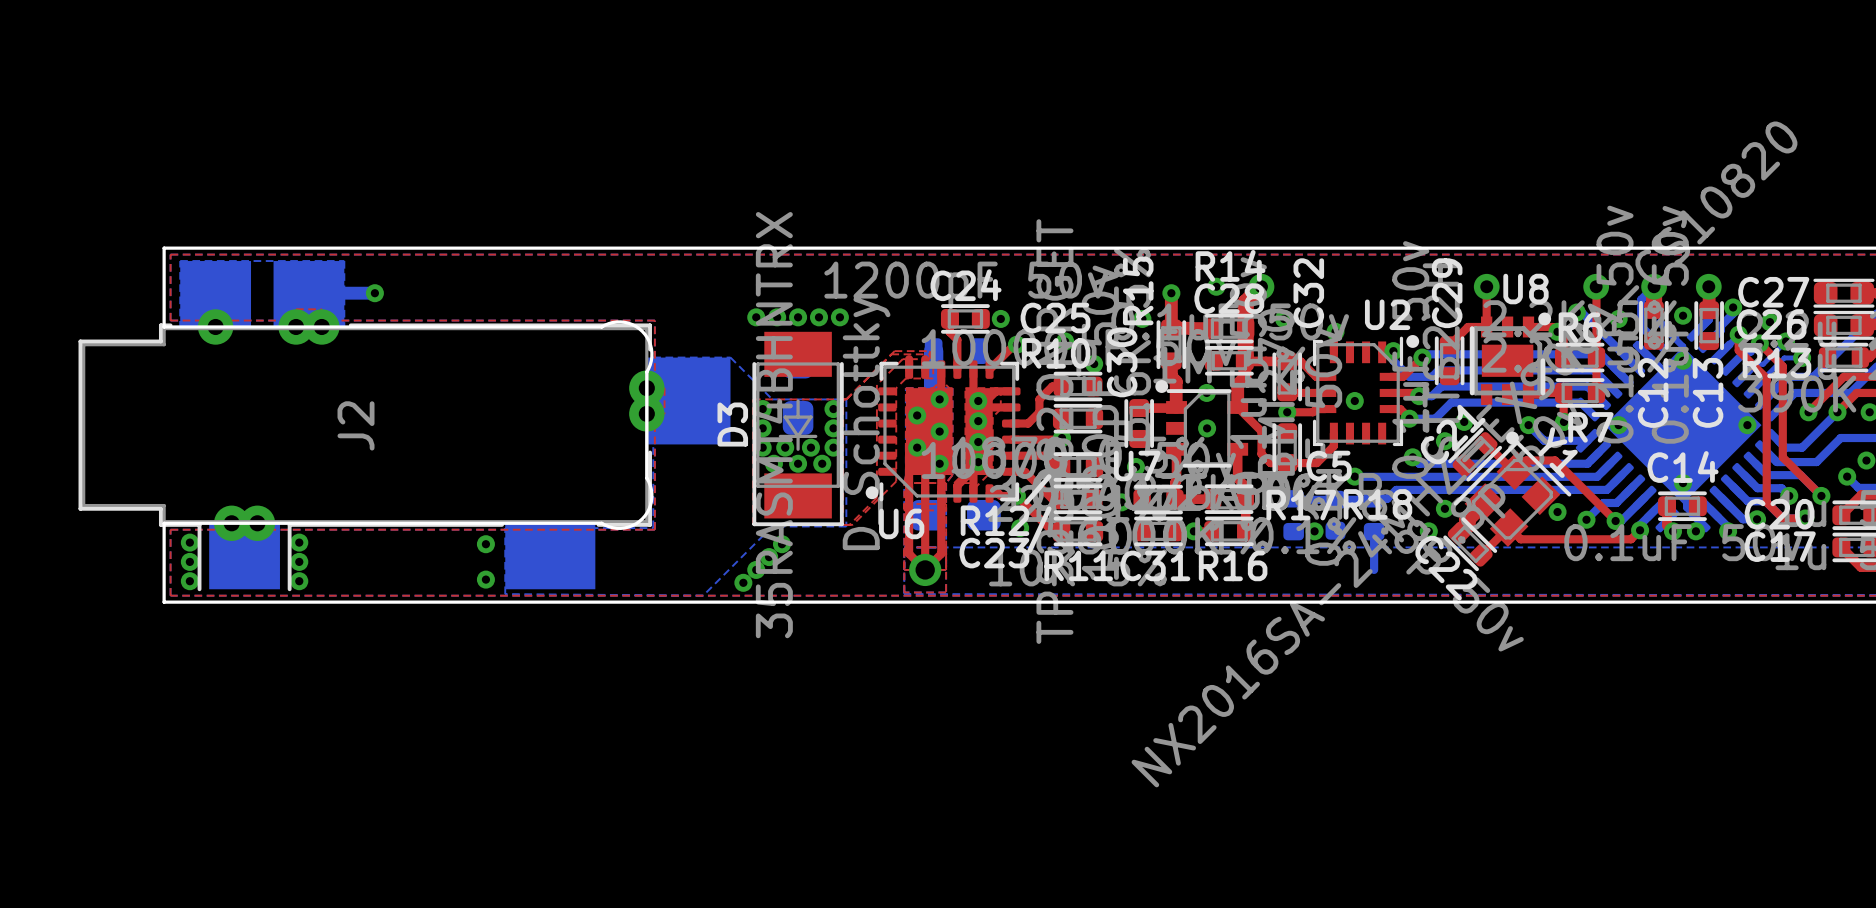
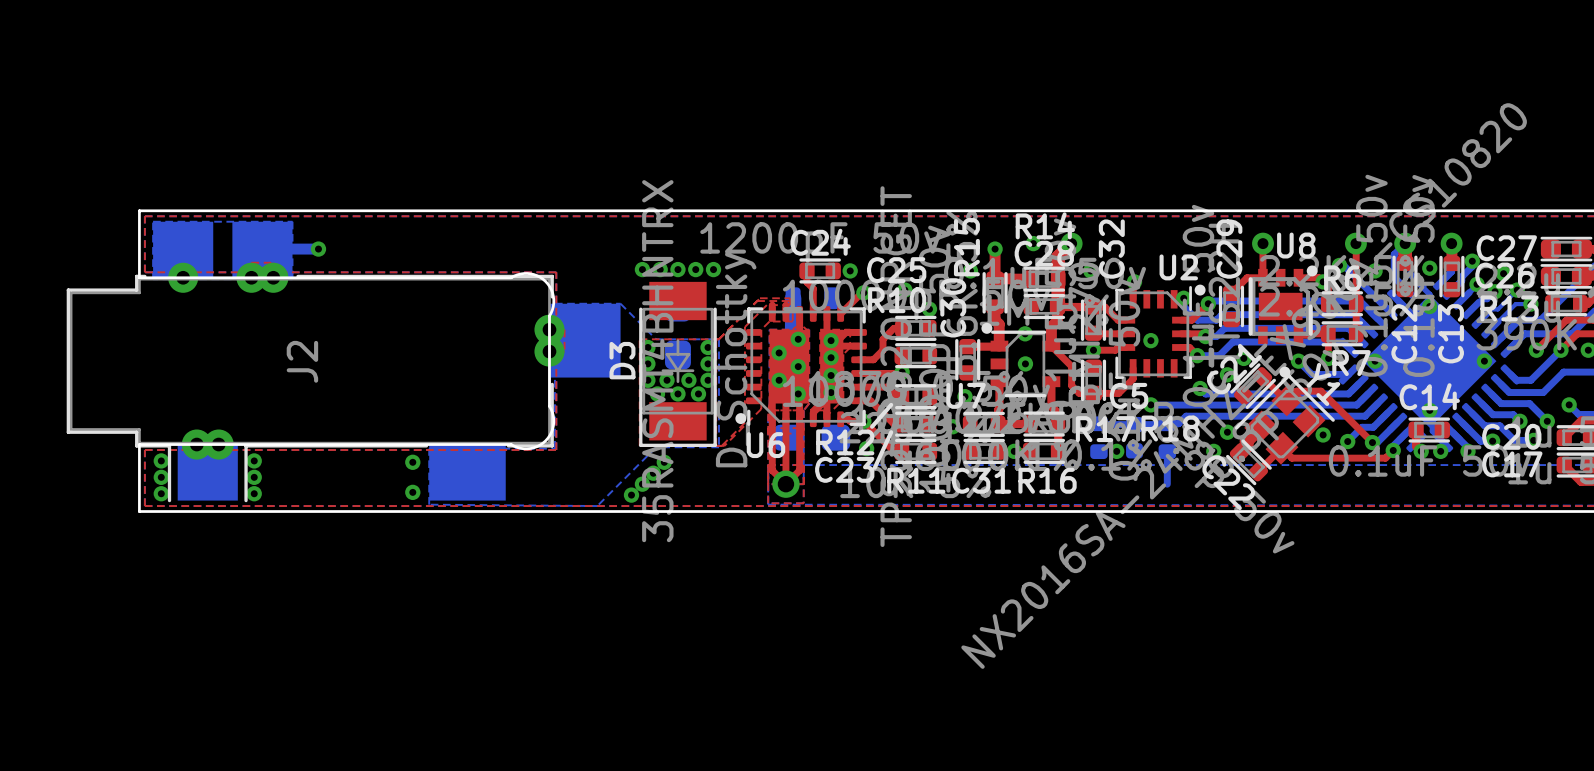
top track: (1738, 334) (1738, 350) (1766, 378) (1766, 502) (1782, 518) (1805, 518) -> none
top track: (1759, 343) (1782, 366) (1782, 457) (1821, 495) -> none
via: (1866, 460) -> none

